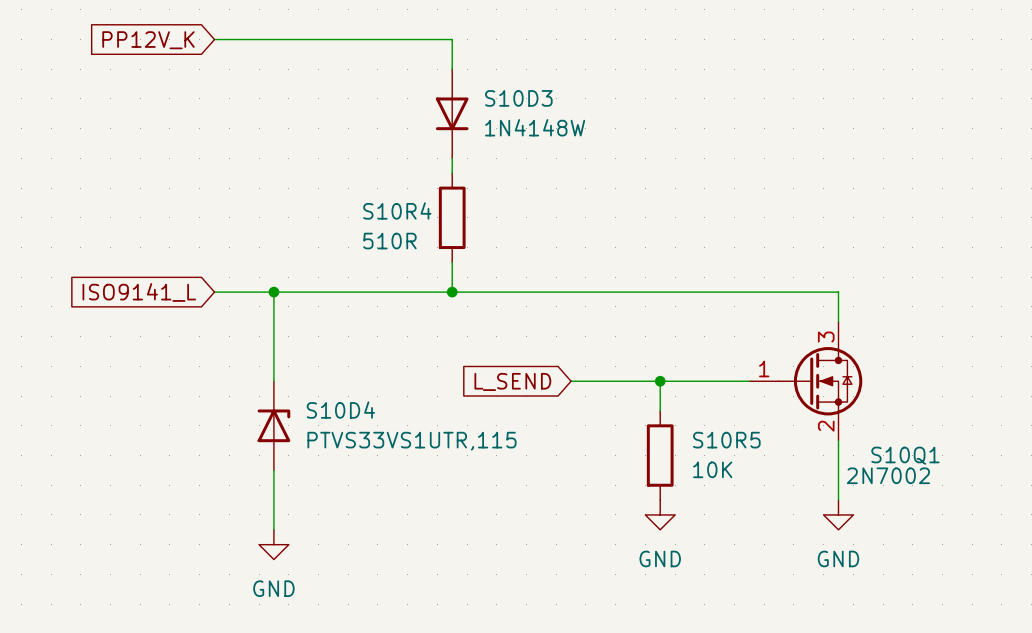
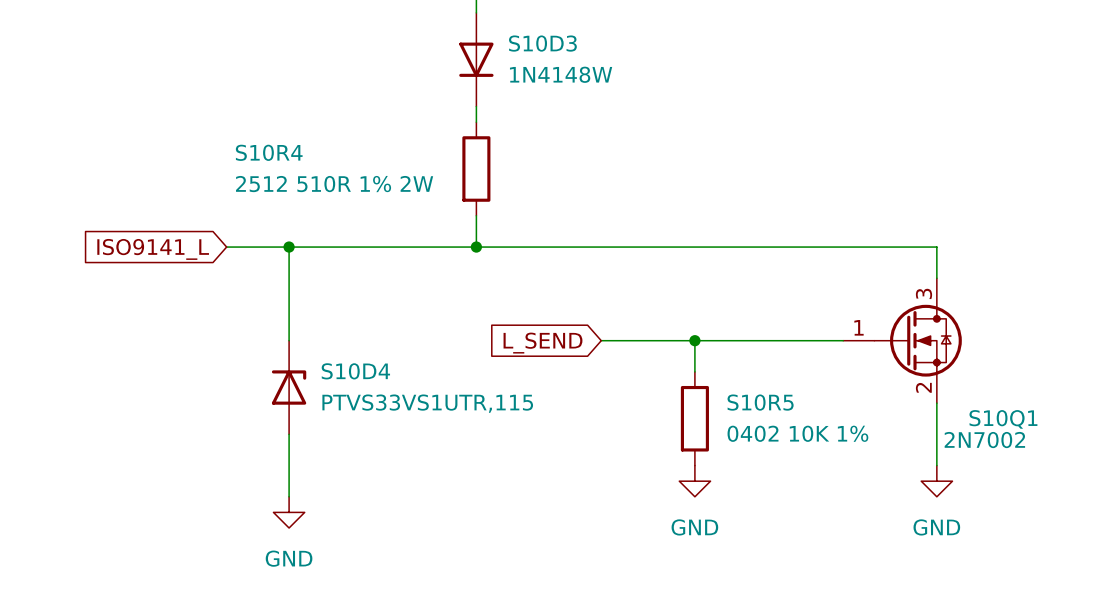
S10R4 name position: S10R4 (397, 210) -> S10R4 (269, 152)
S10R4 value: 510R (389, 241) -> 2512 510R 1% 2W (334, 184)
wire: (838, 292) (838, 321) -> (882, 247) (936, 247) (936, 278)
S10Q1 position: (805, 381) -> (902, 340)
wire: (838, 440) (838, 500) -> (936, 403) (936, 465)
S10R5 value: 10K (712, 469) -> 0402 10K 1% (797, 433)
power symbol position: GND (838, 514) -> GND (936, 481)

